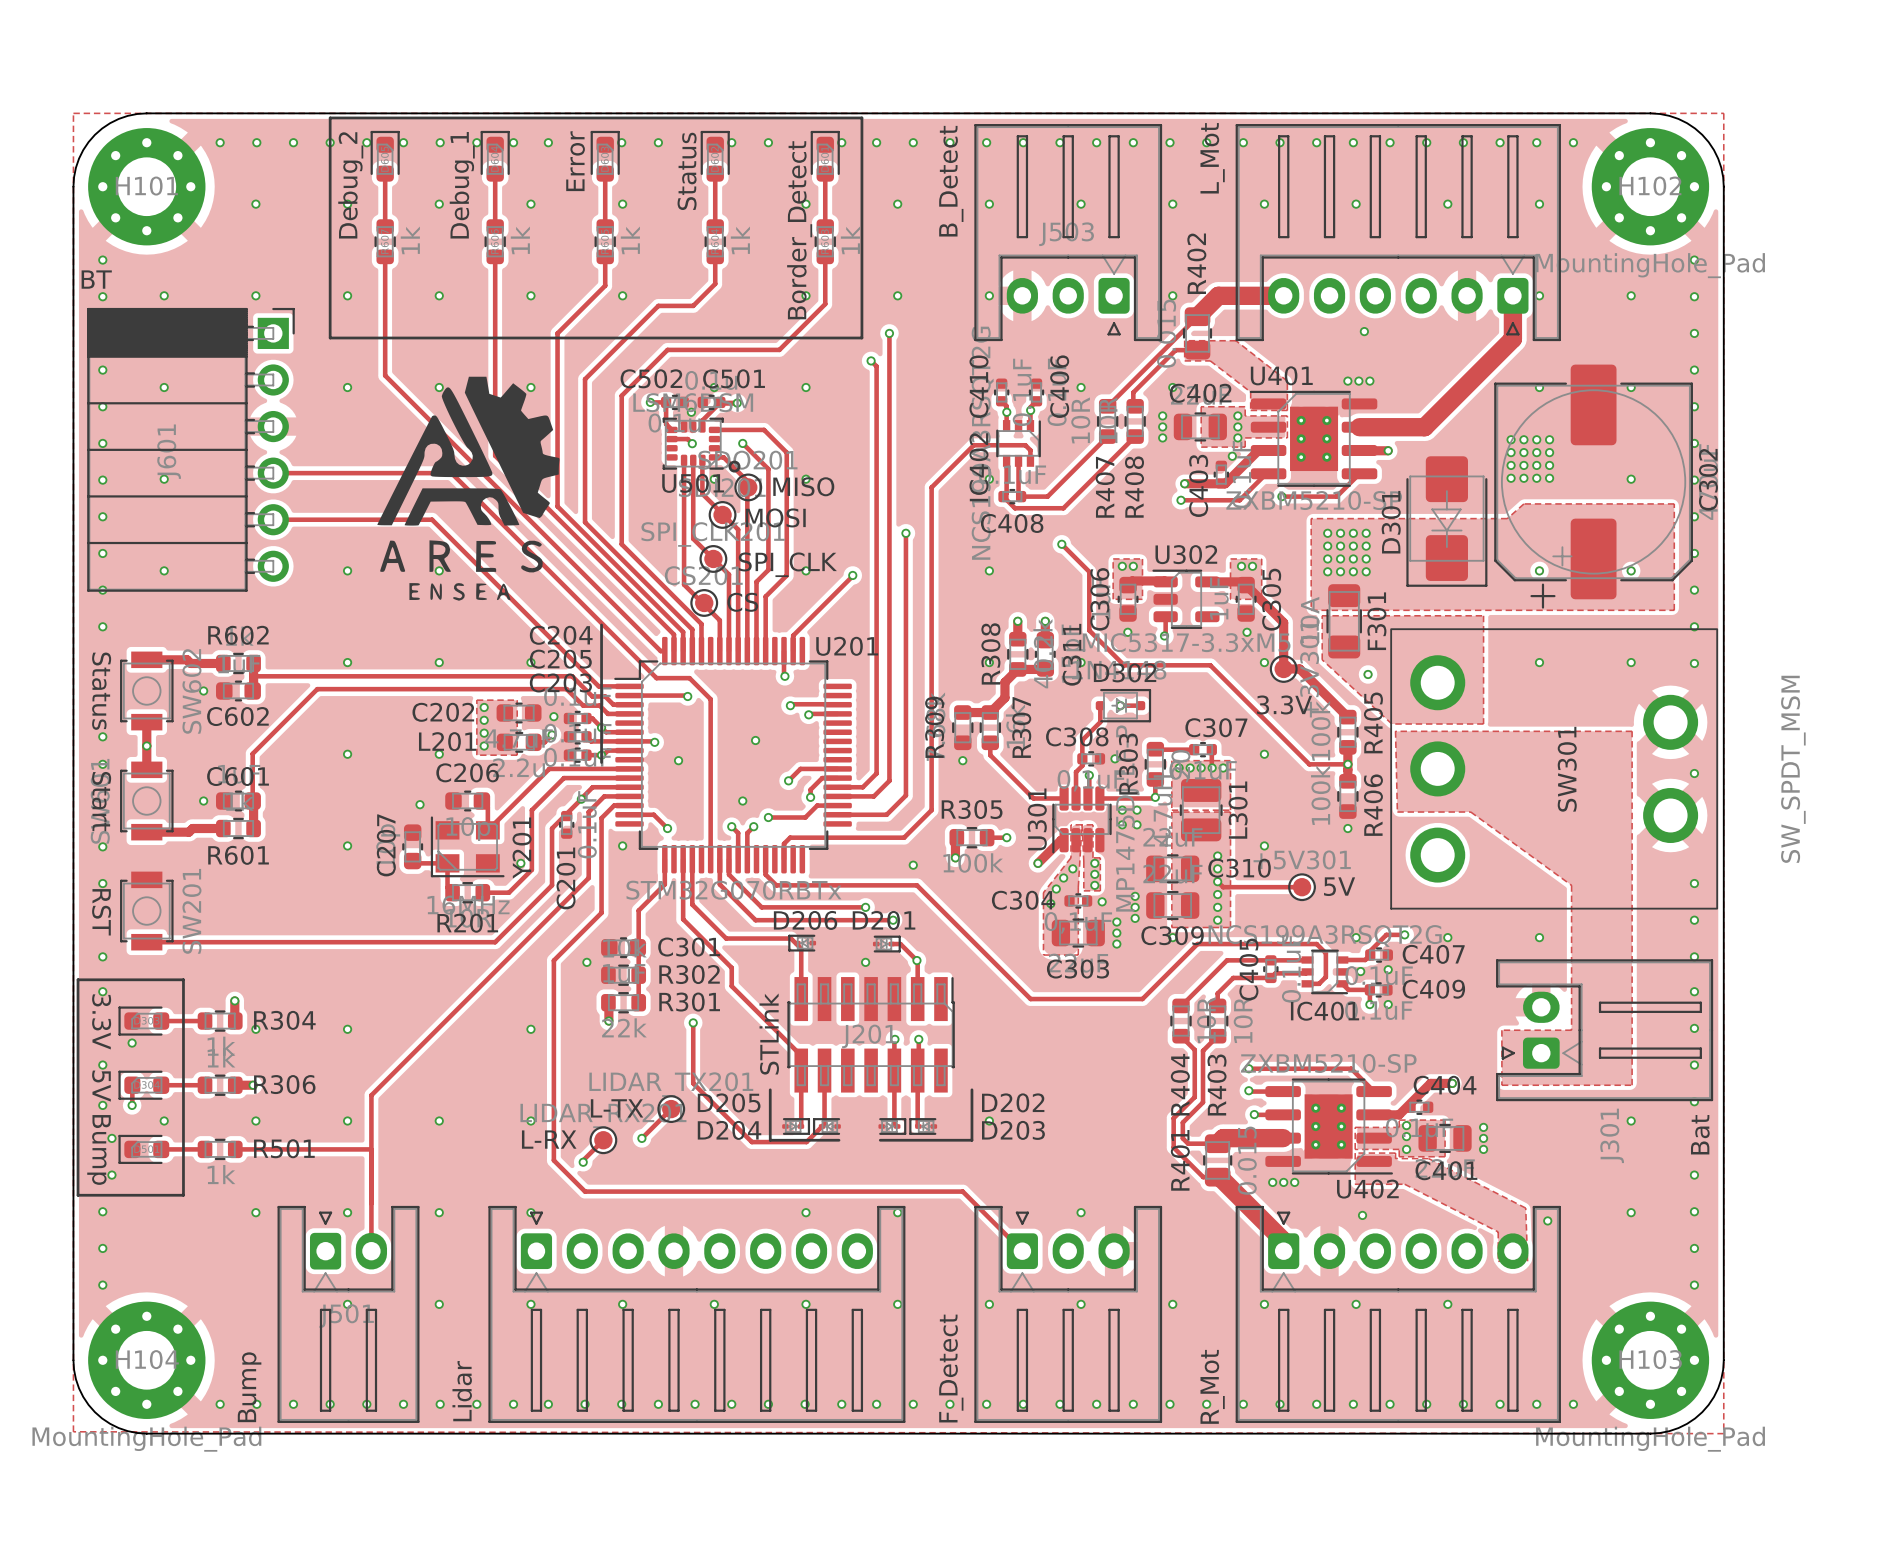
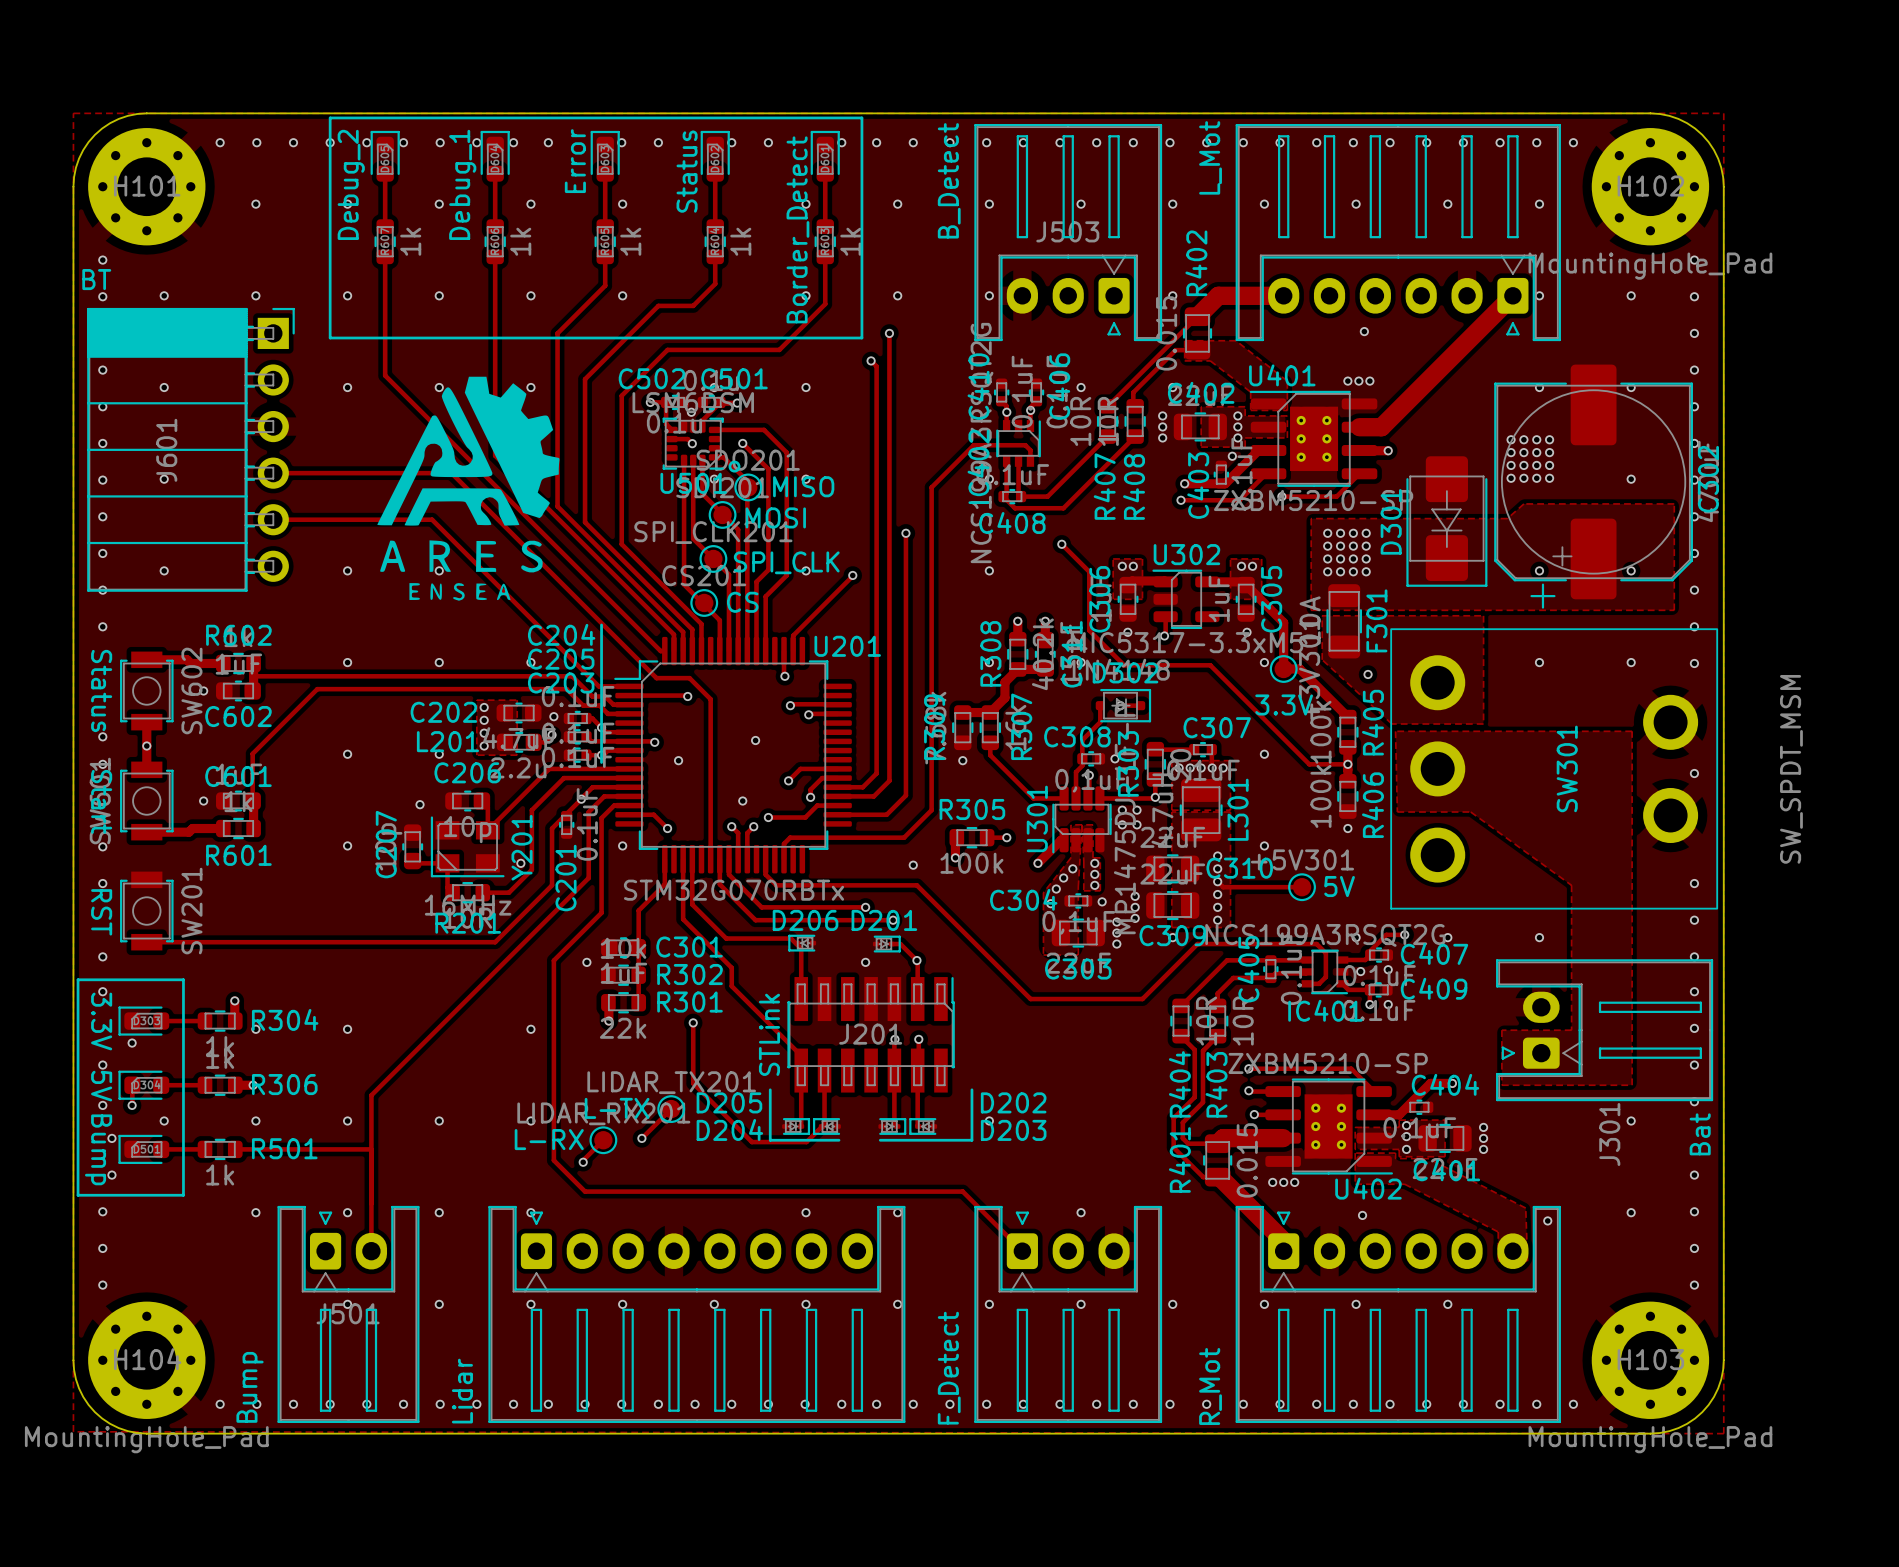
track: (1512, 295) (1512, 338) (1424, 427) (1381, 427) -> (1512, 295) (1381, 427)

